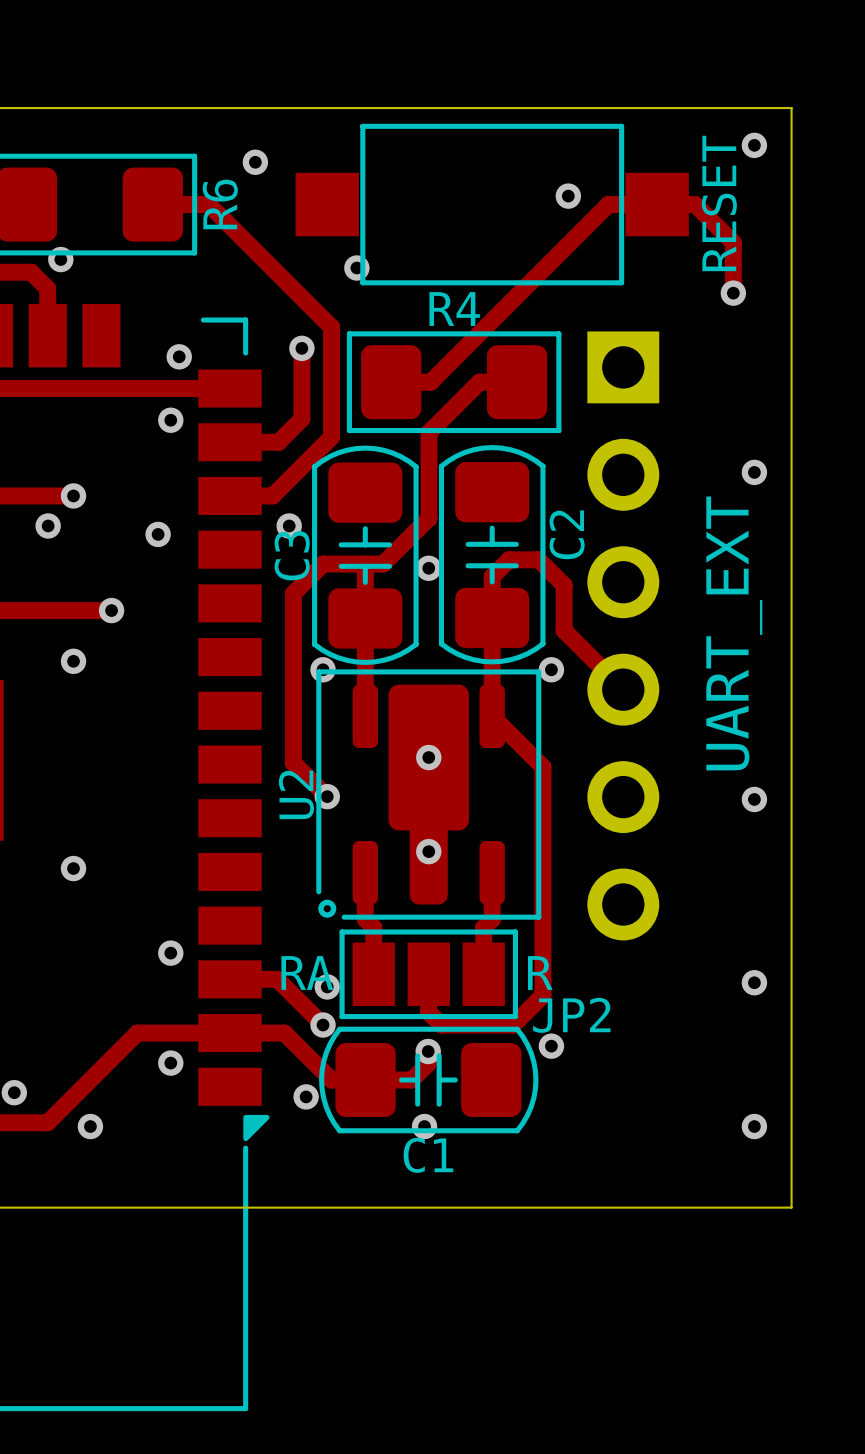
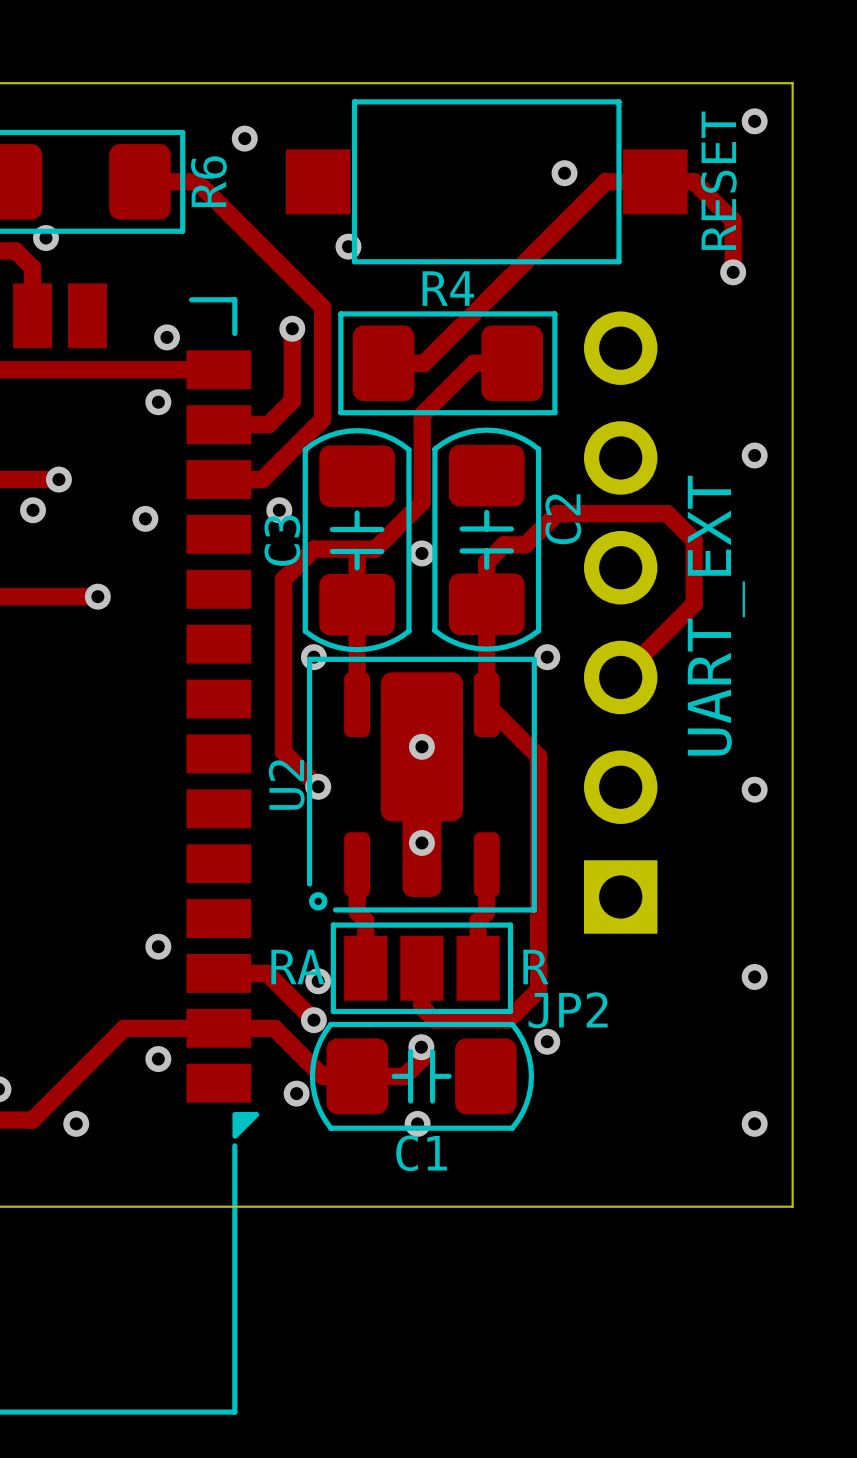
track: (530, 559) (538, 559) (564, 585) (564, 630) (623, 689) -> (525, 544) (556, 513) (667, 513) (694, 540) (694, 604) (620, 677)
part rotation: 0° (623, 635) -> 180° (620, 622)
via: (73, 661) -> none
via: (73, 868) -> none

